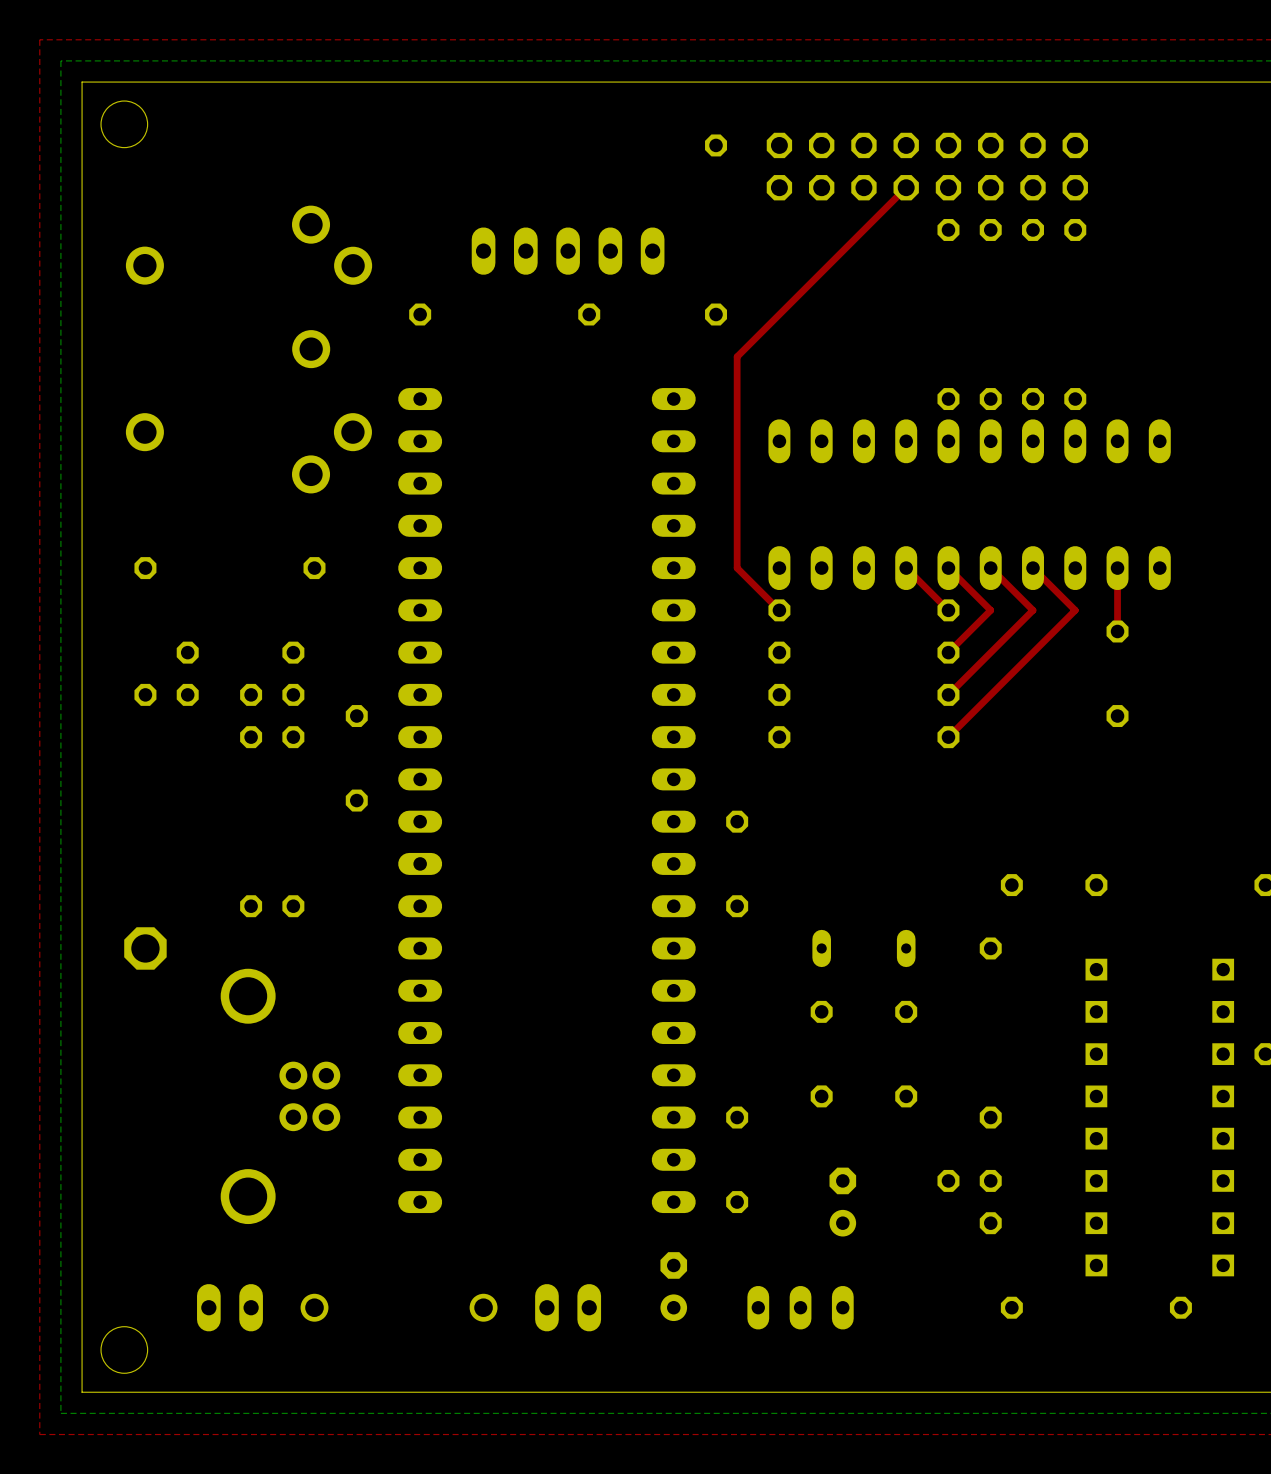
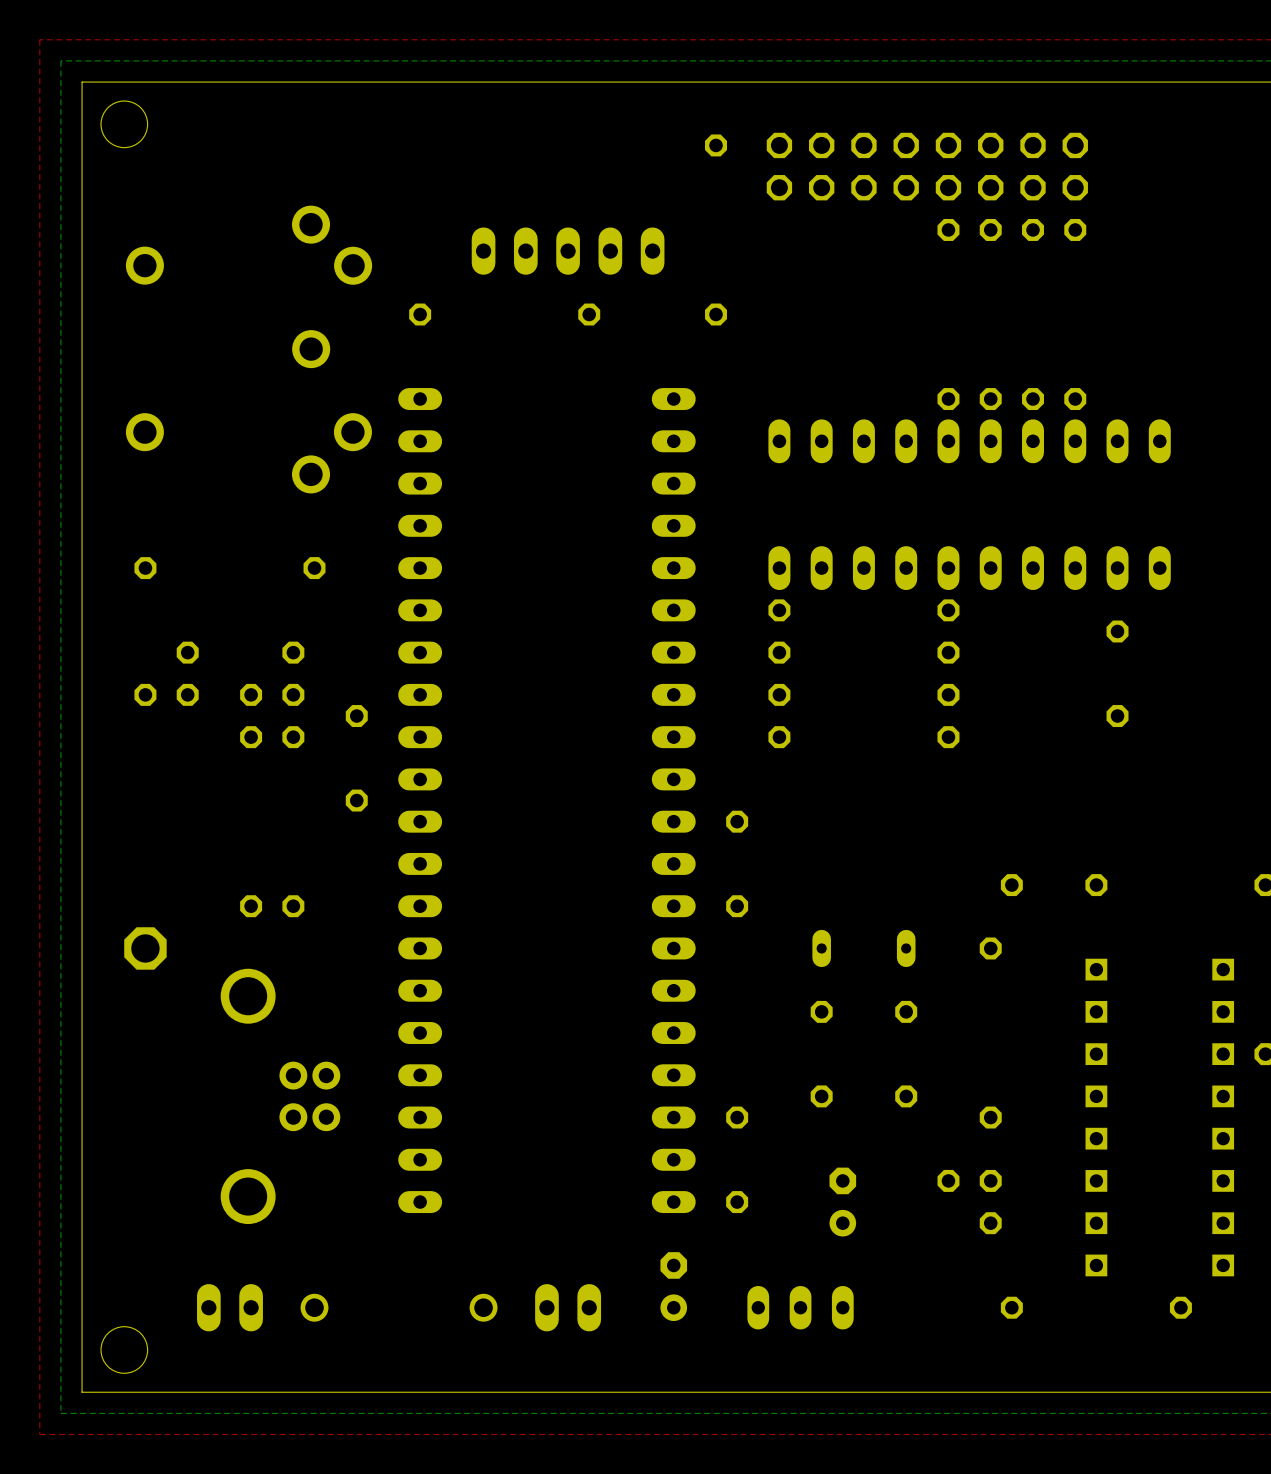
top track: (906, 187) (737, 356) (737, 568) (779, 610) -> none
top track: (906, 568) (948, 610) -> none
top track: (948, 568) (990, 610) (948, 652) -> none
top track: (990, 568) (1033, 610) (948, 694) -> none
top track: (1033, 568) (1075, 610) (948, 737) -> none
top track: (1117, 568) (1117, 631) -> none

